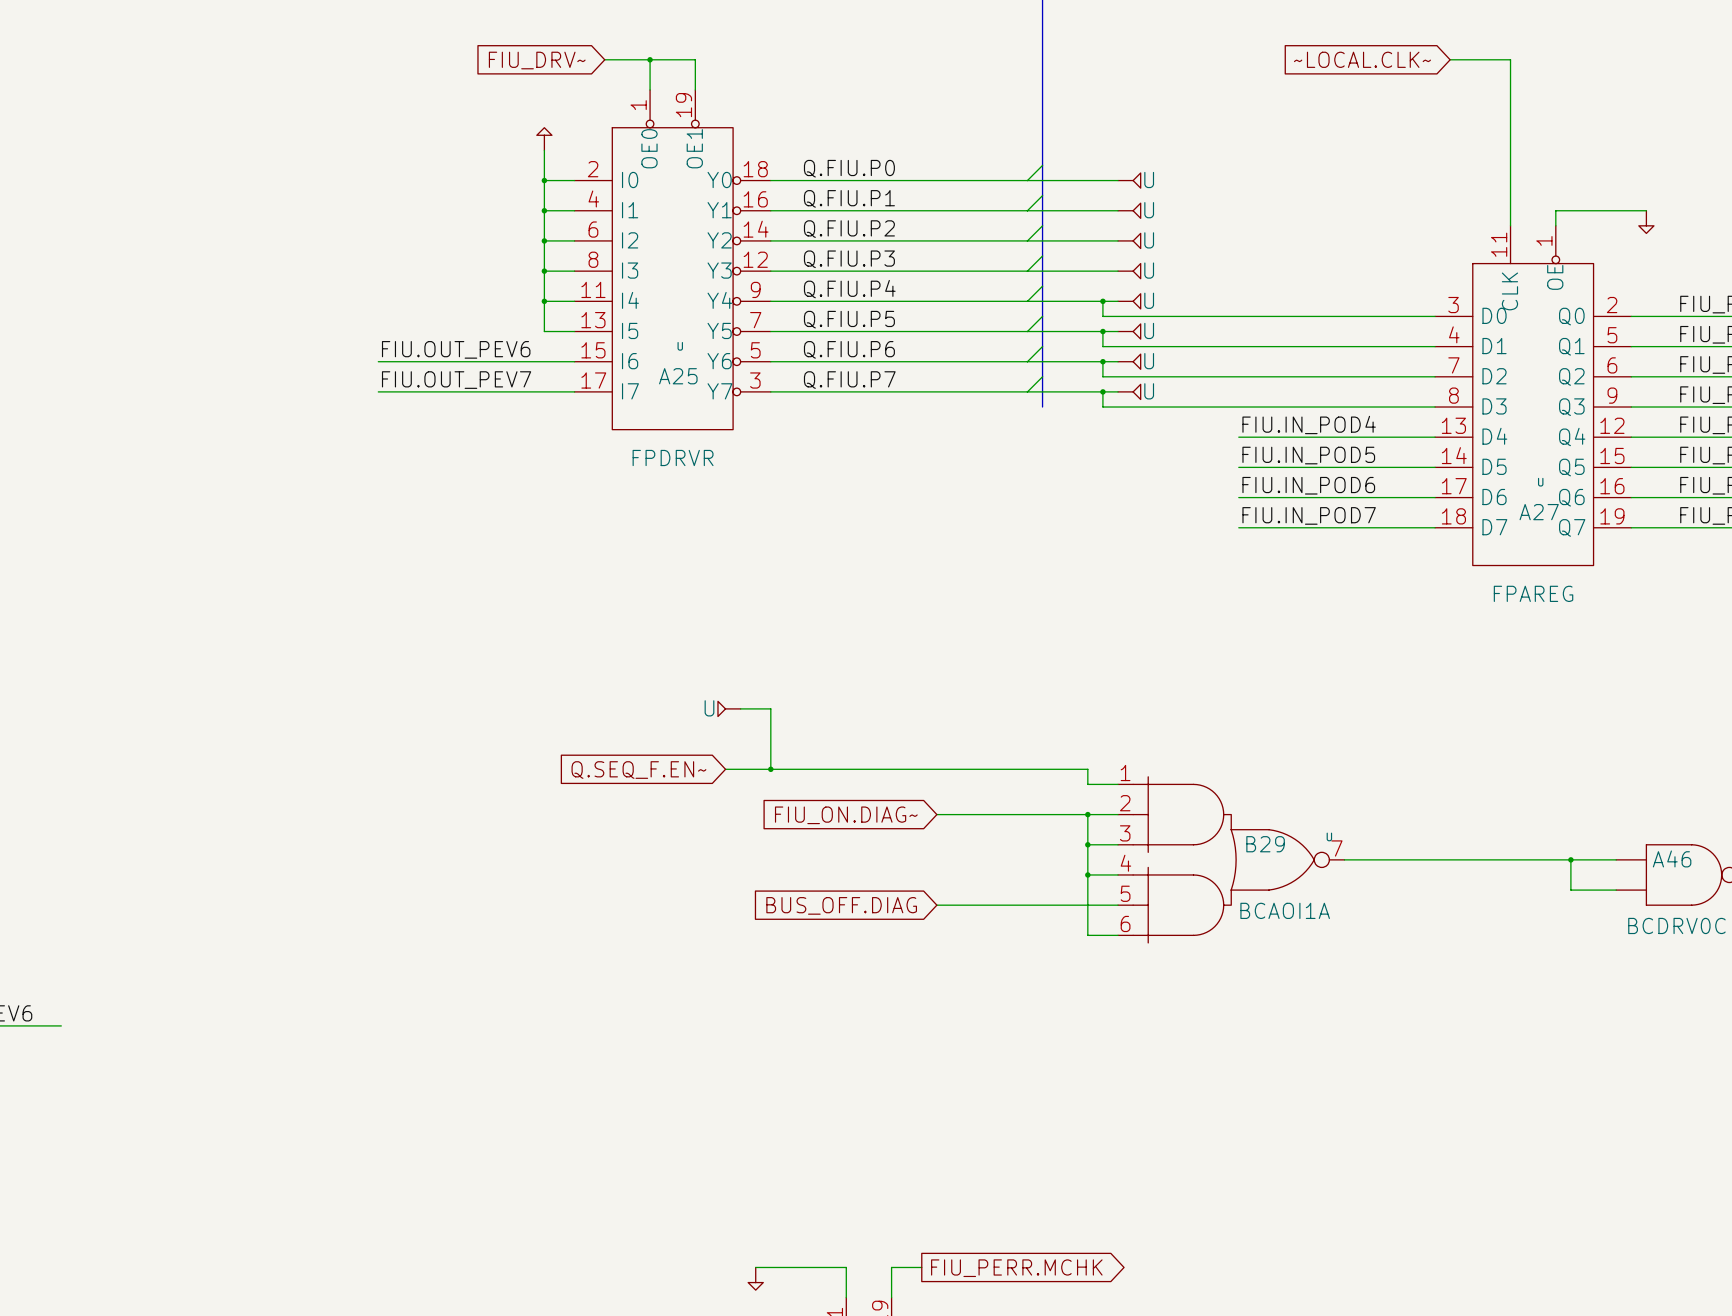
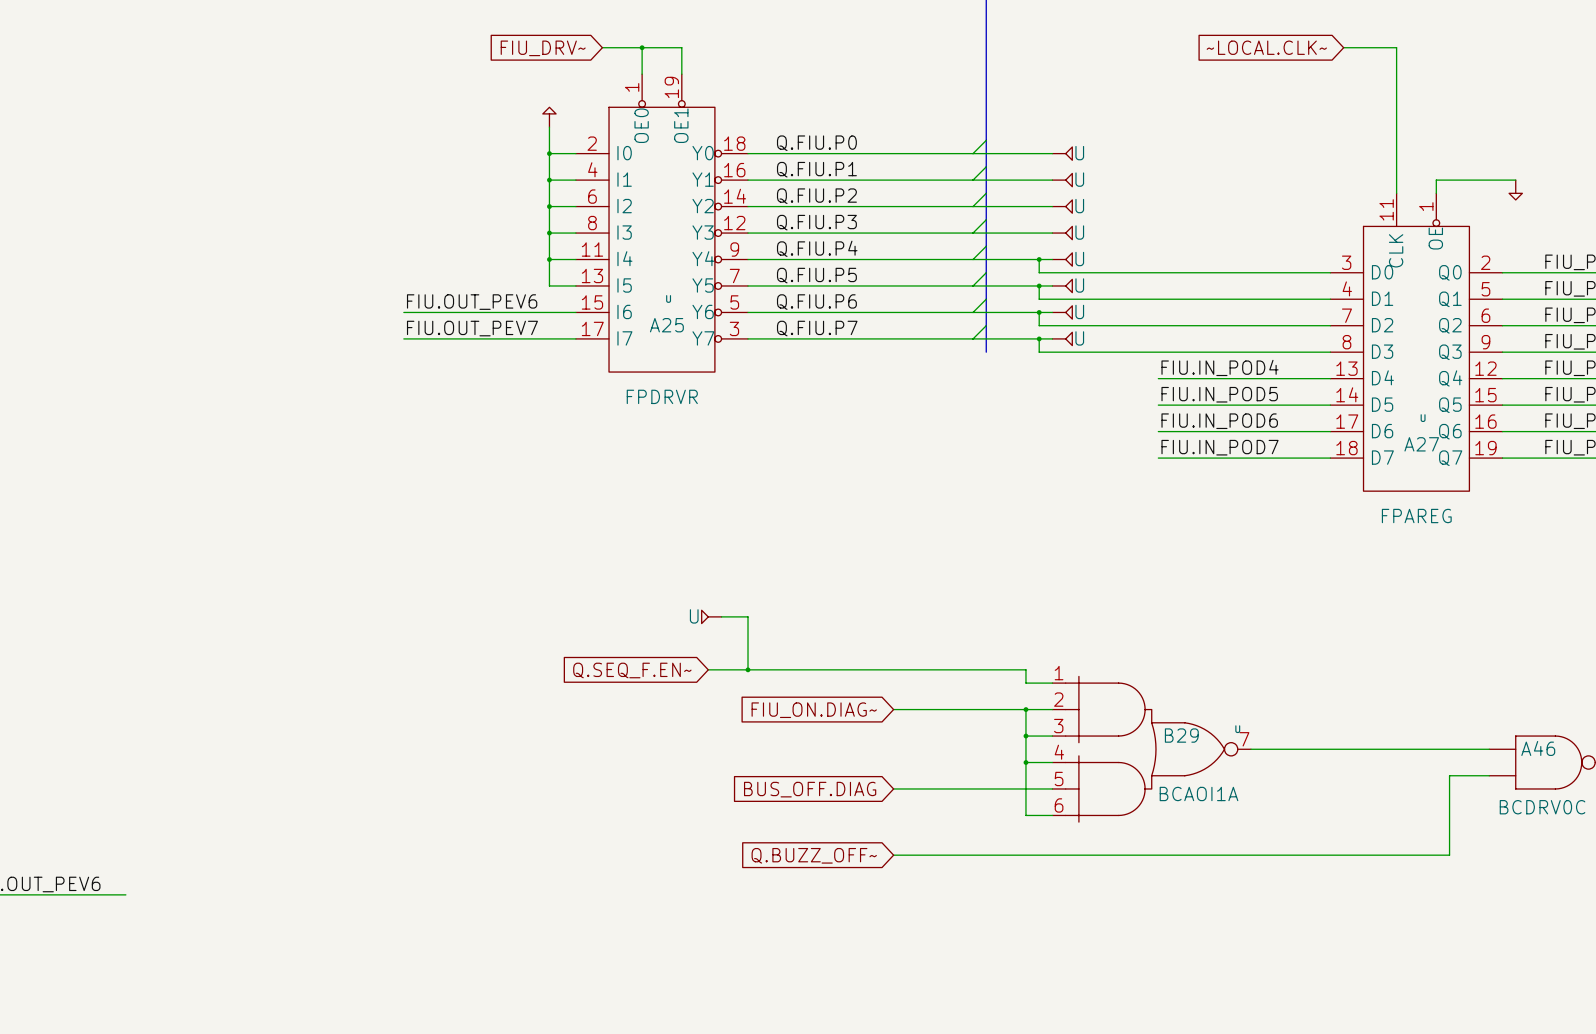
wire: (1570, 859) (1570, 890) -> (893, 855) (1449, 855) (1449, 775)
junction: (1570, 859) -> none
global label: none -> Q.BUZZ_OFF~ (814, 855)

